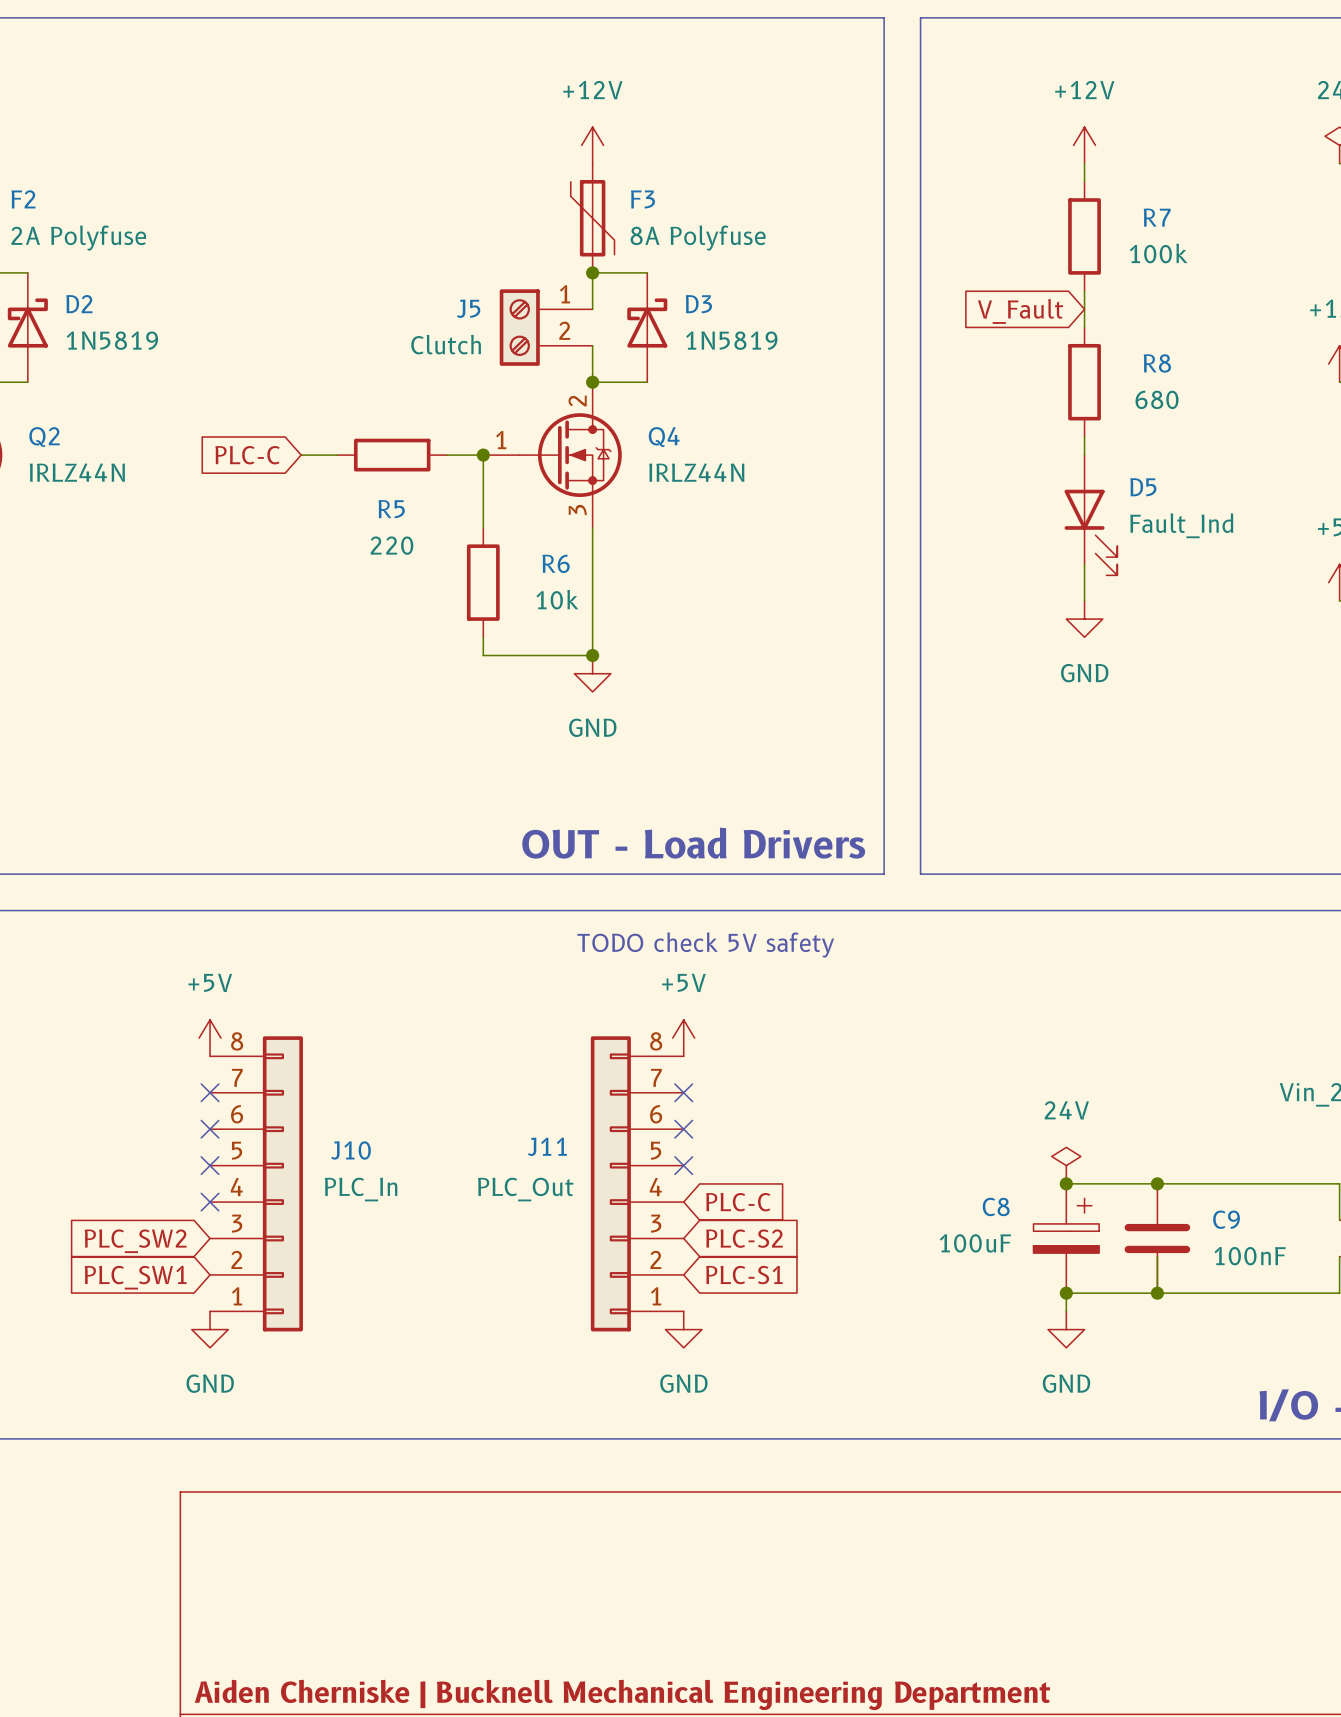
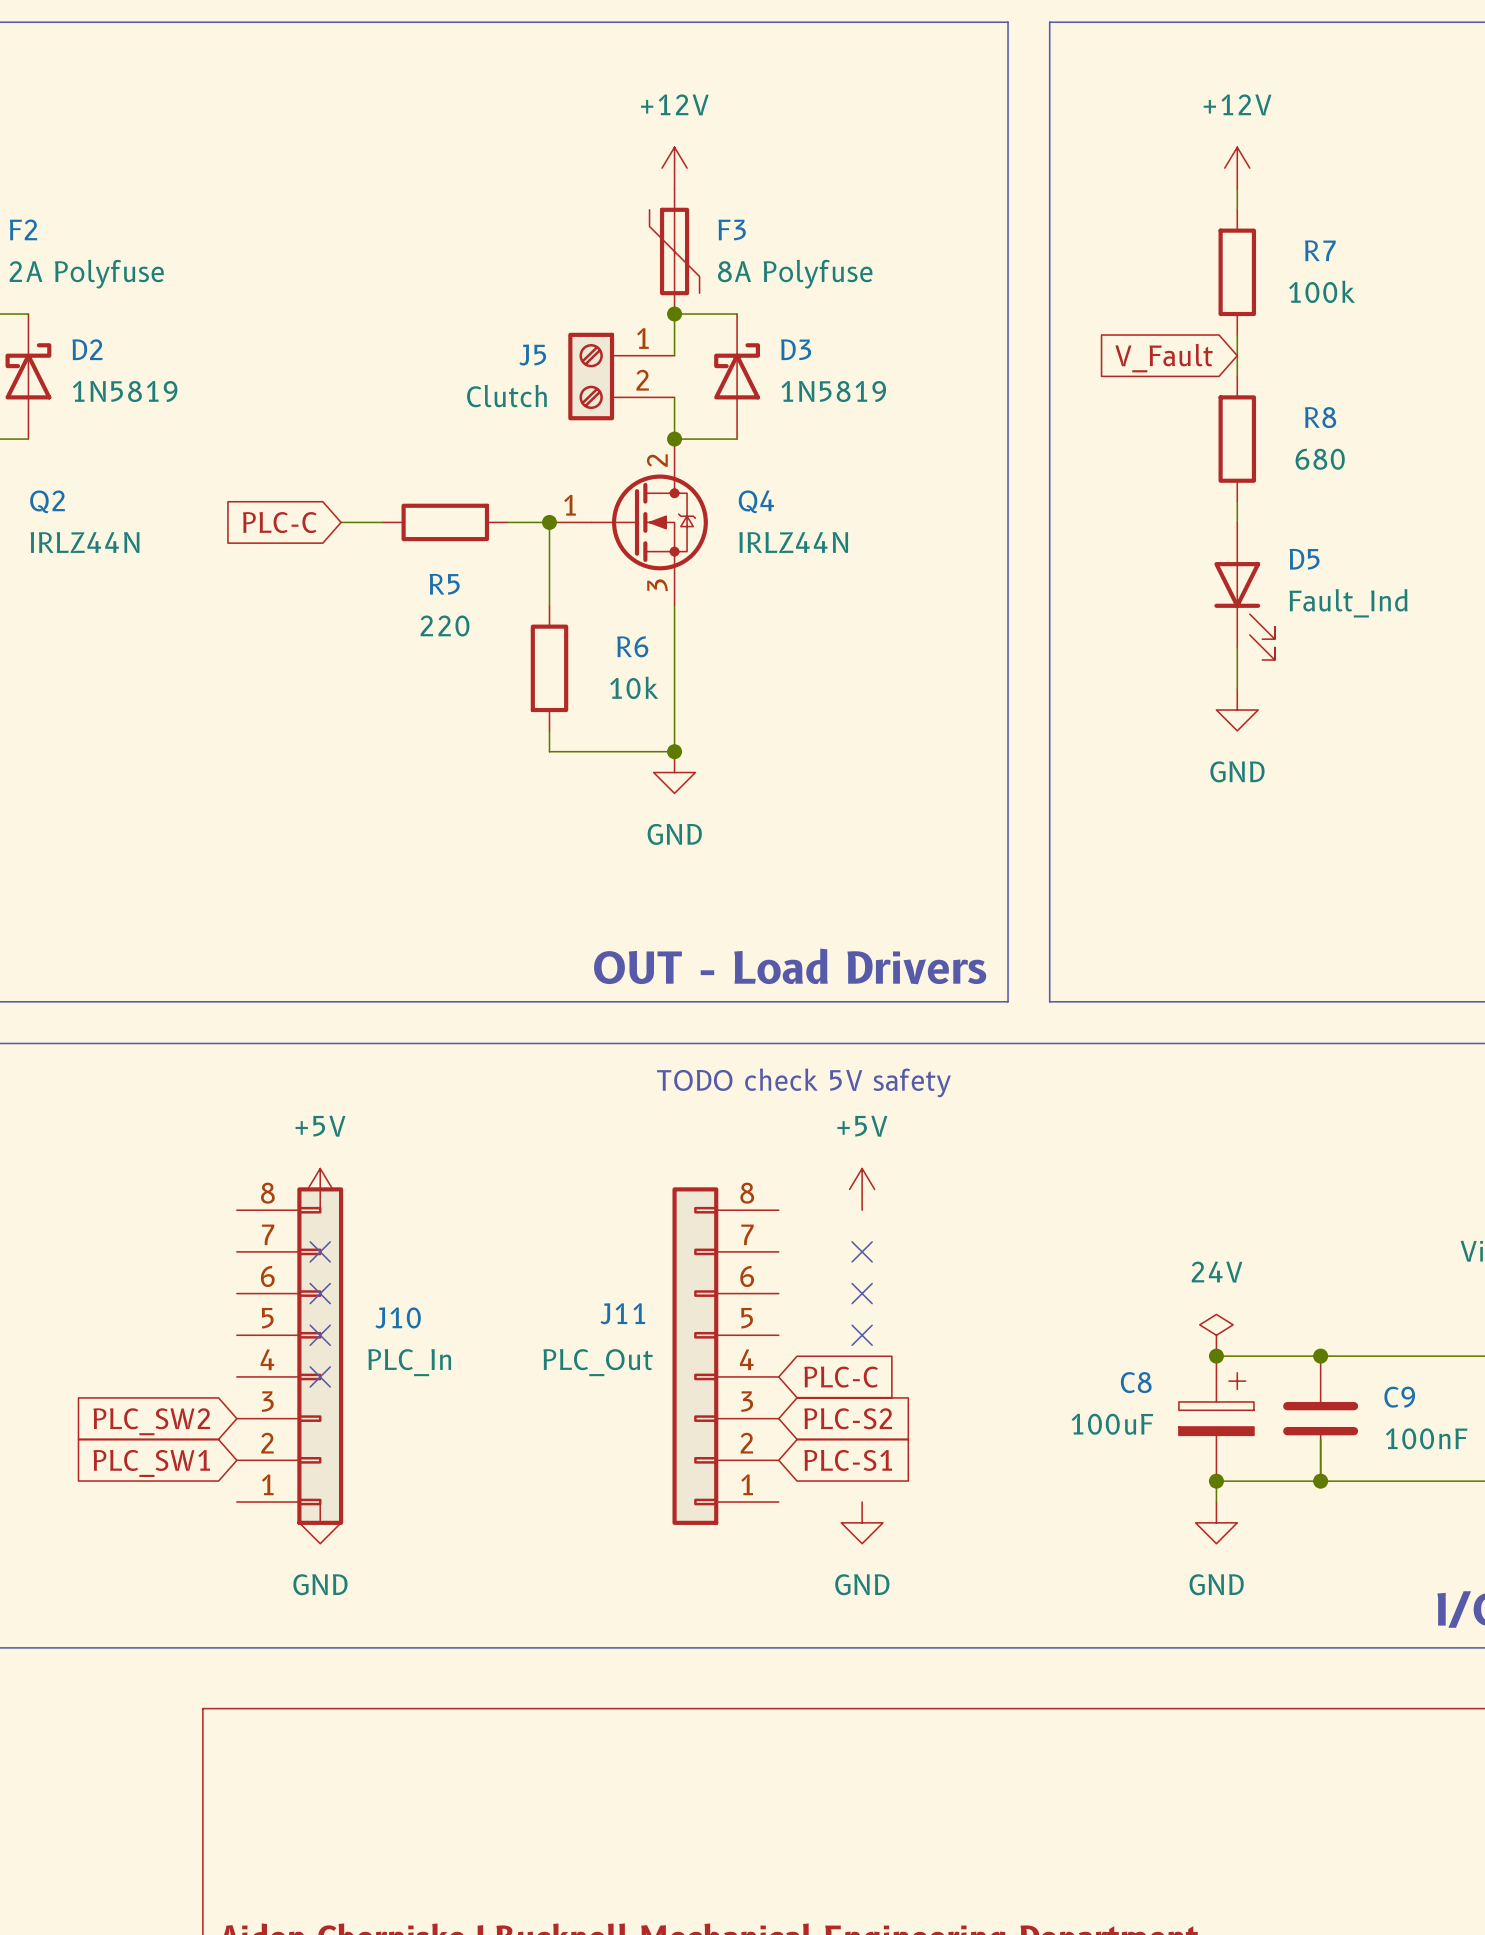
power symbol position: +5V (210, 1038) -> +5V (320, 1189)
power symbol position: +5V (683, 1038) -> +5V (862, 1189)
no-connect mark: (210, 1092) -> none
no-connect mark: none -> (320, 1251)
no-connect mark: (683, 1092) -> none
no-connect mark: none -> (862, 1251)
no-connect mark: (210, 1129) -> none
no-connect mark: none -> (320, 1293)
no-connect mark: (683, 1129) -> none
no-connect mark: none -> (862, 1293)
no-connect mark: (210, 1165) -> none
no-connect mark: none -> (320, 1335)
no-connect mark: (683, 1165) -> none
no-connect mark: none -> (862, 1335)
no-connect mark: (210, 1202) -> none
no-connect mark: none -> (320, 1376)
power symbol position: GND (210, 1329) -> GND (320, 1522)
power symbol position: GND (683, 1329) -> GND (862, 1522)

